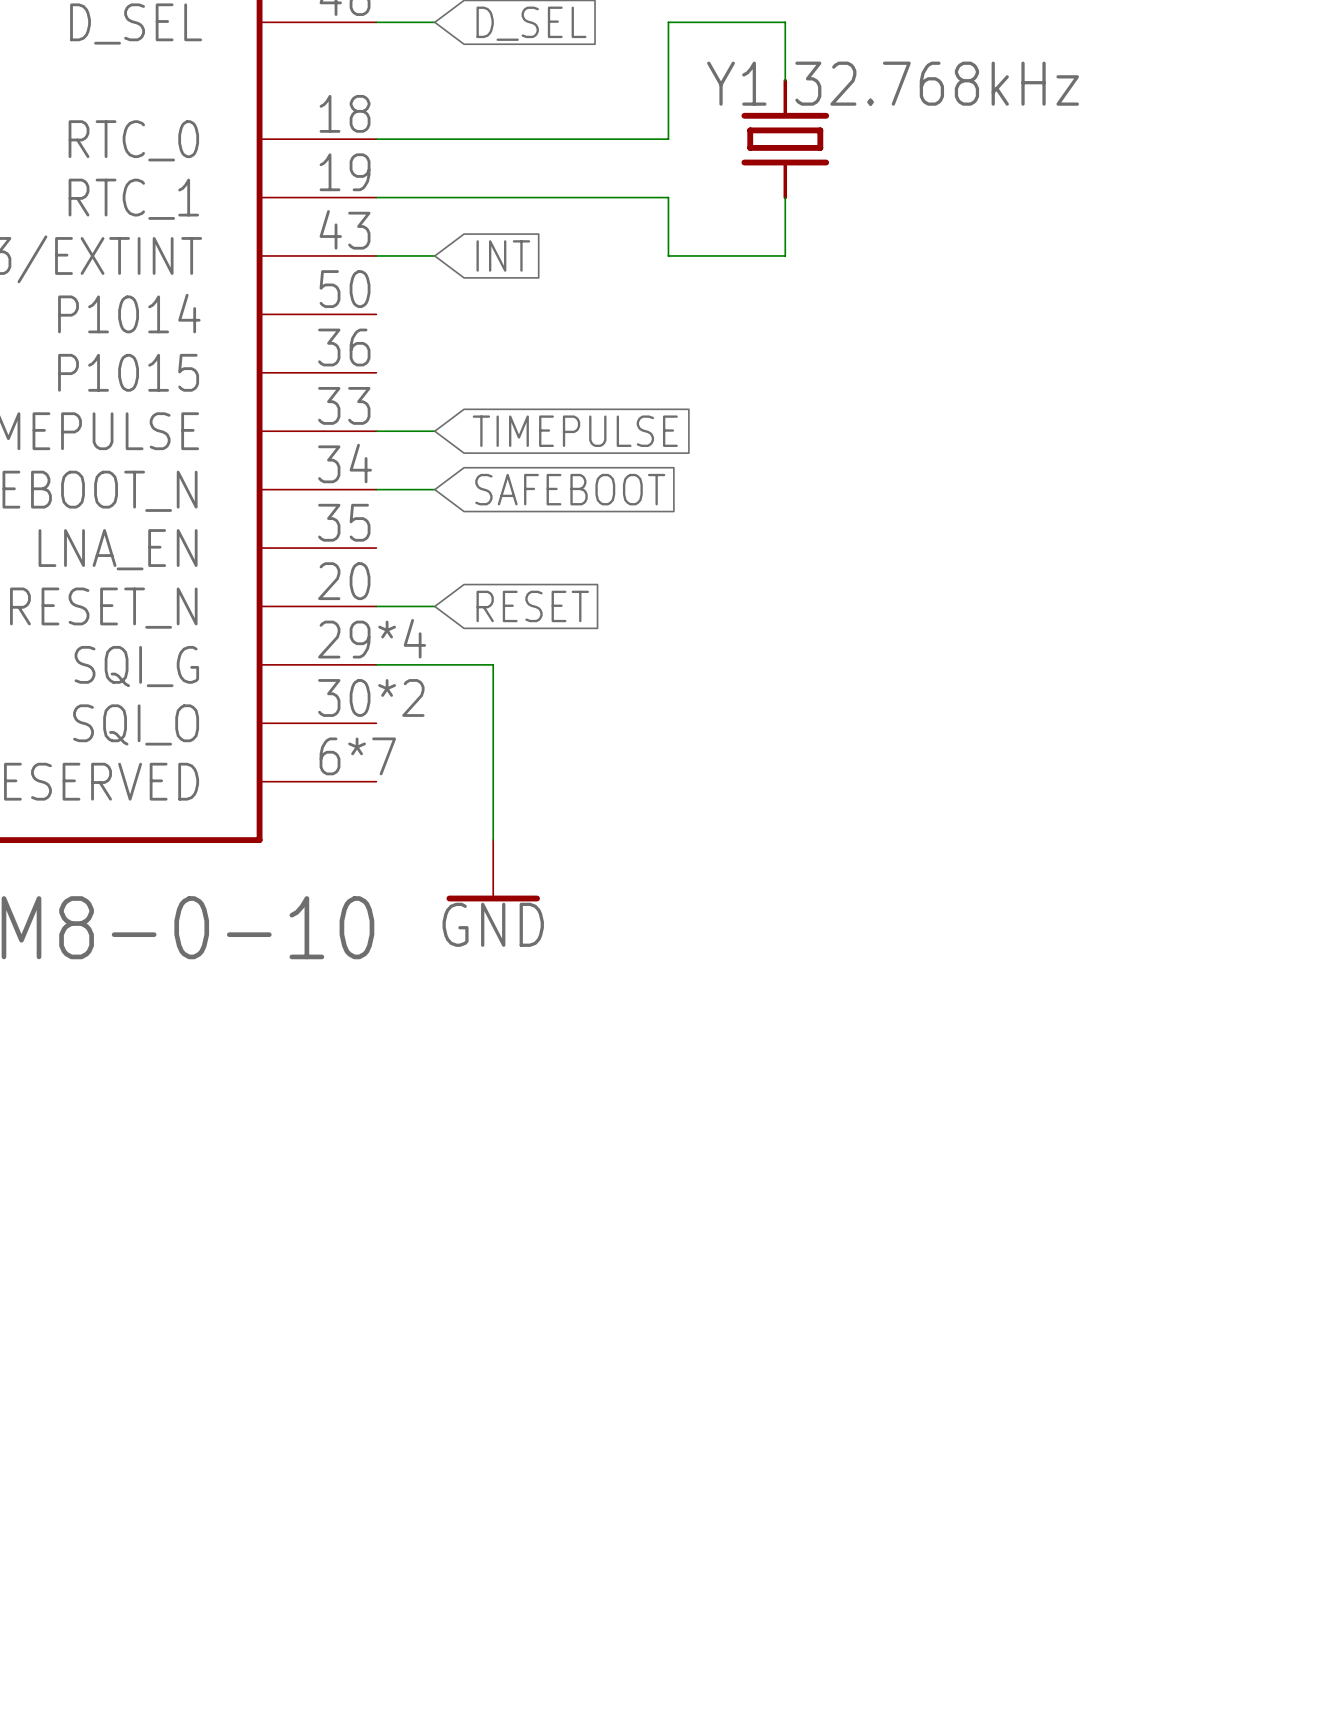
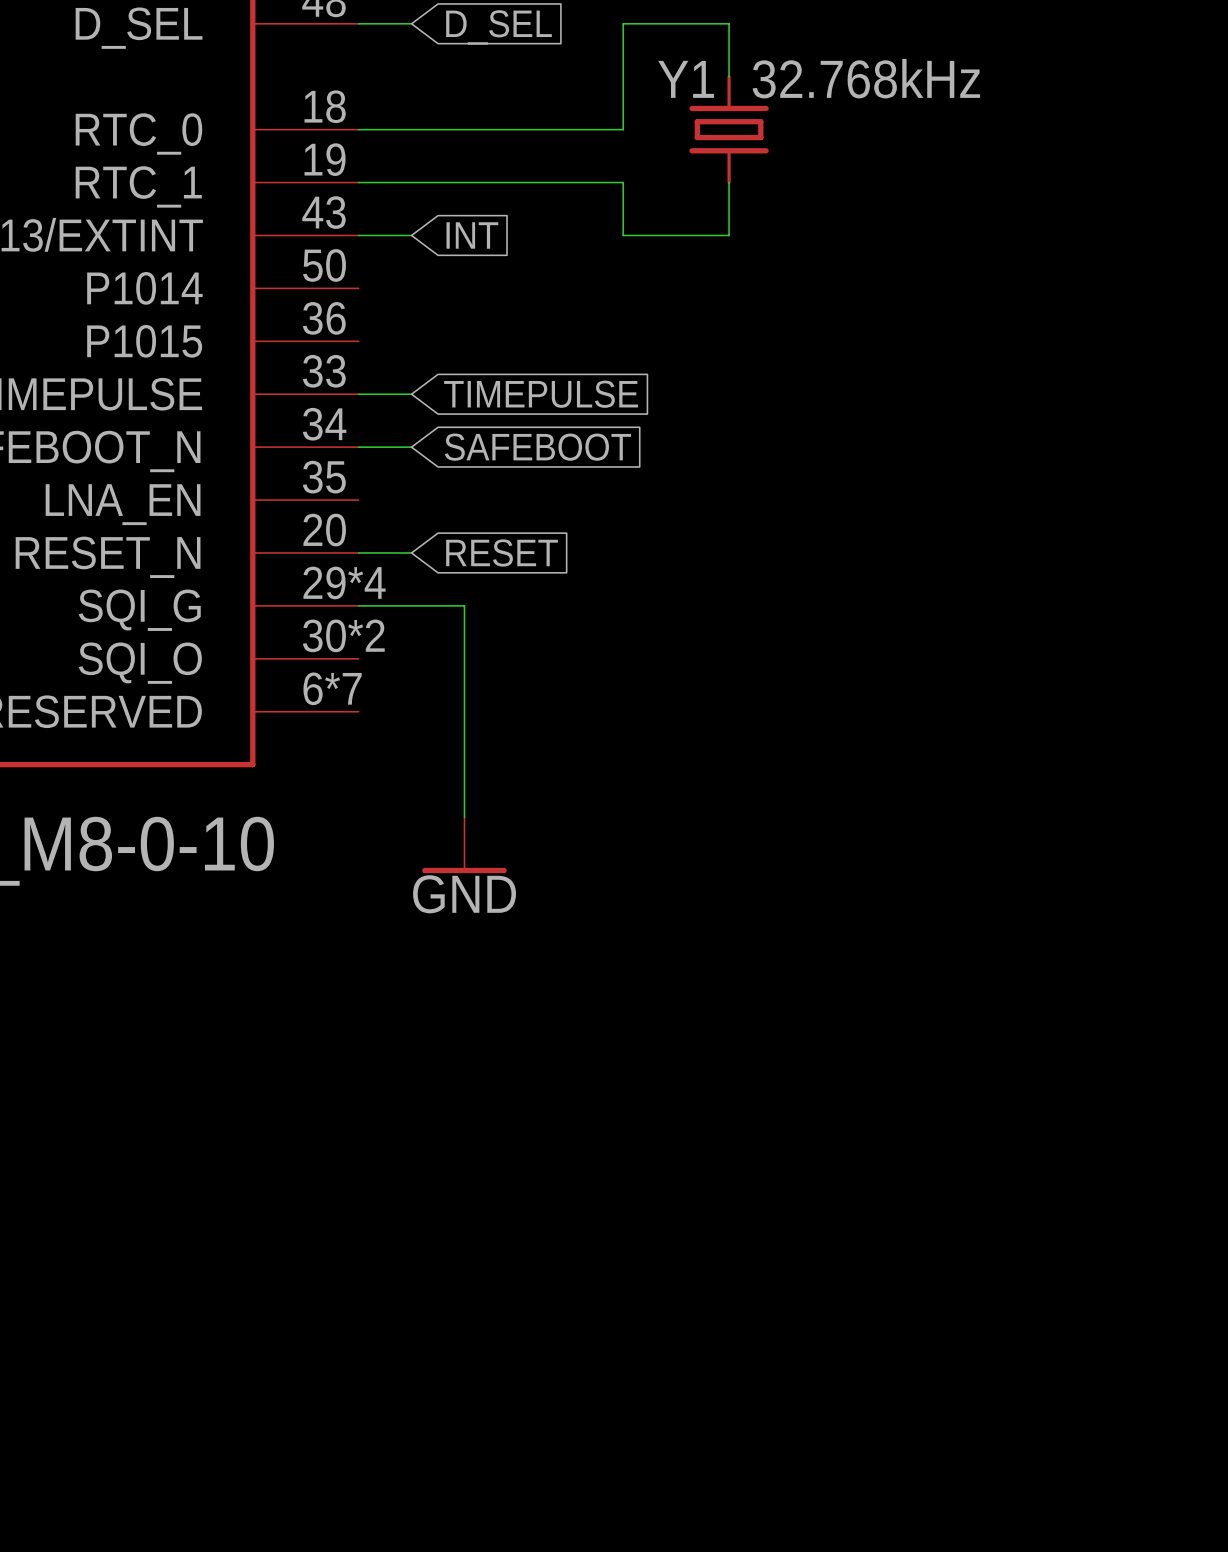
power symbol position: GND (493, 870) -> GND (464, 845)

